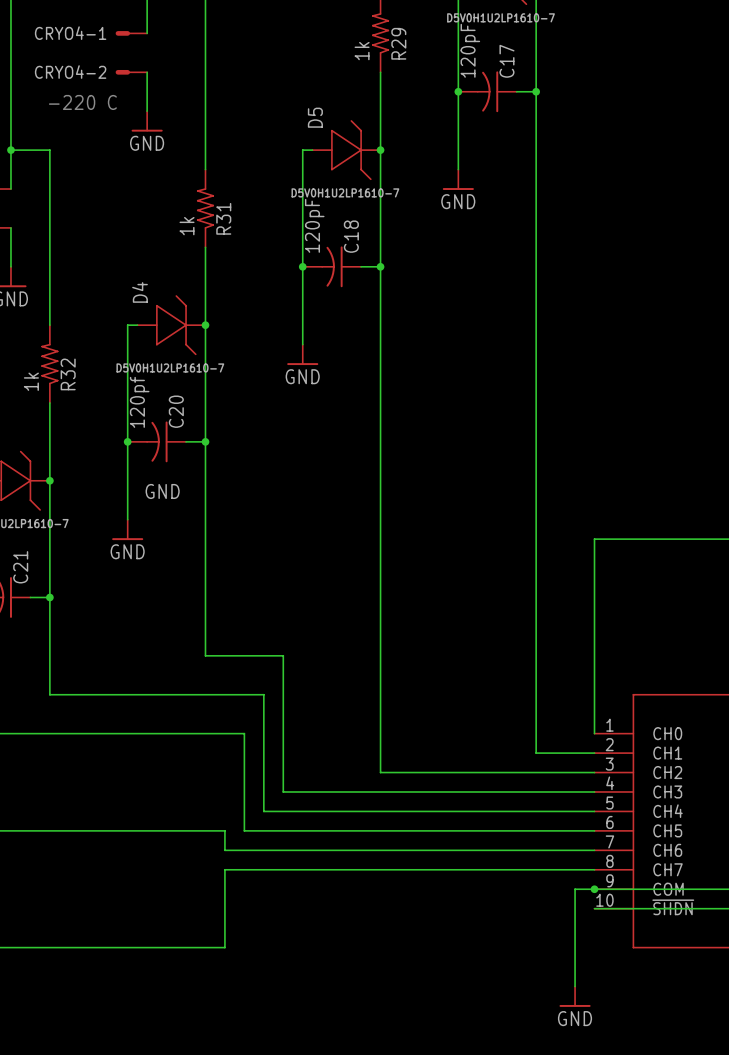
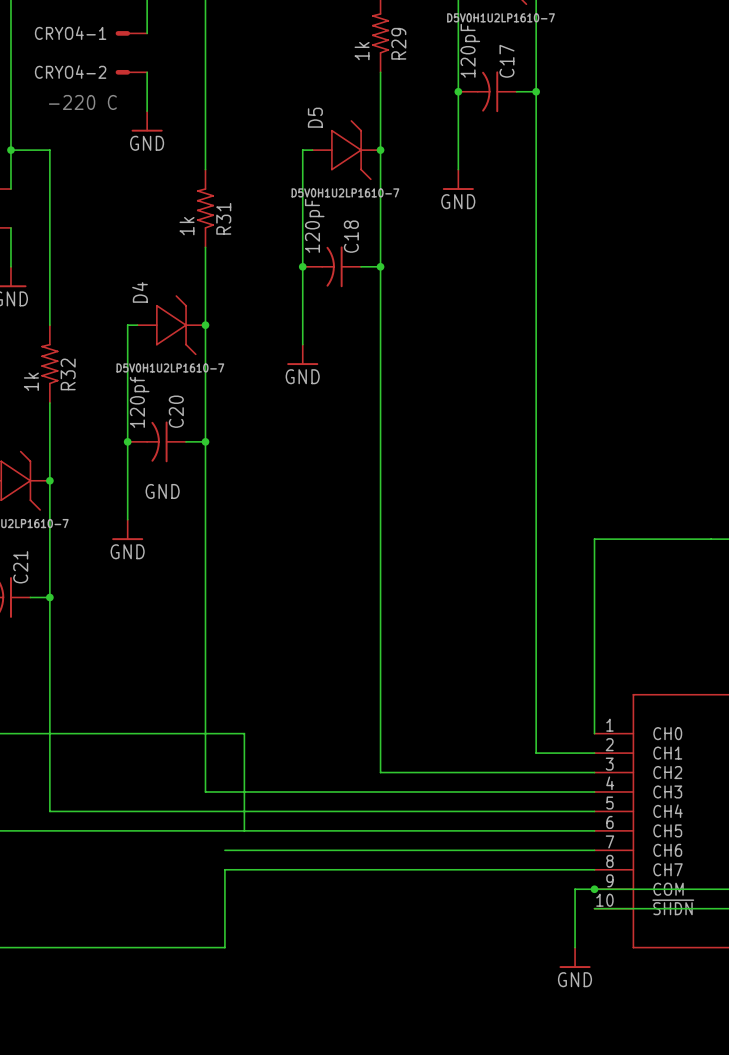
wire: (205, 655) (283, 655) (283, 791) -> (205, 655) (205, 791) (283, 791)
wire: (49, 694) (263, 694) (263, 811) -> (49, 694) (49, 811) (263, 811)
wire: (224, 830) (224, 850) -> (224, 830) (244, 830)
power symbol position: GND (575, 996) -> GND (575, 957)

